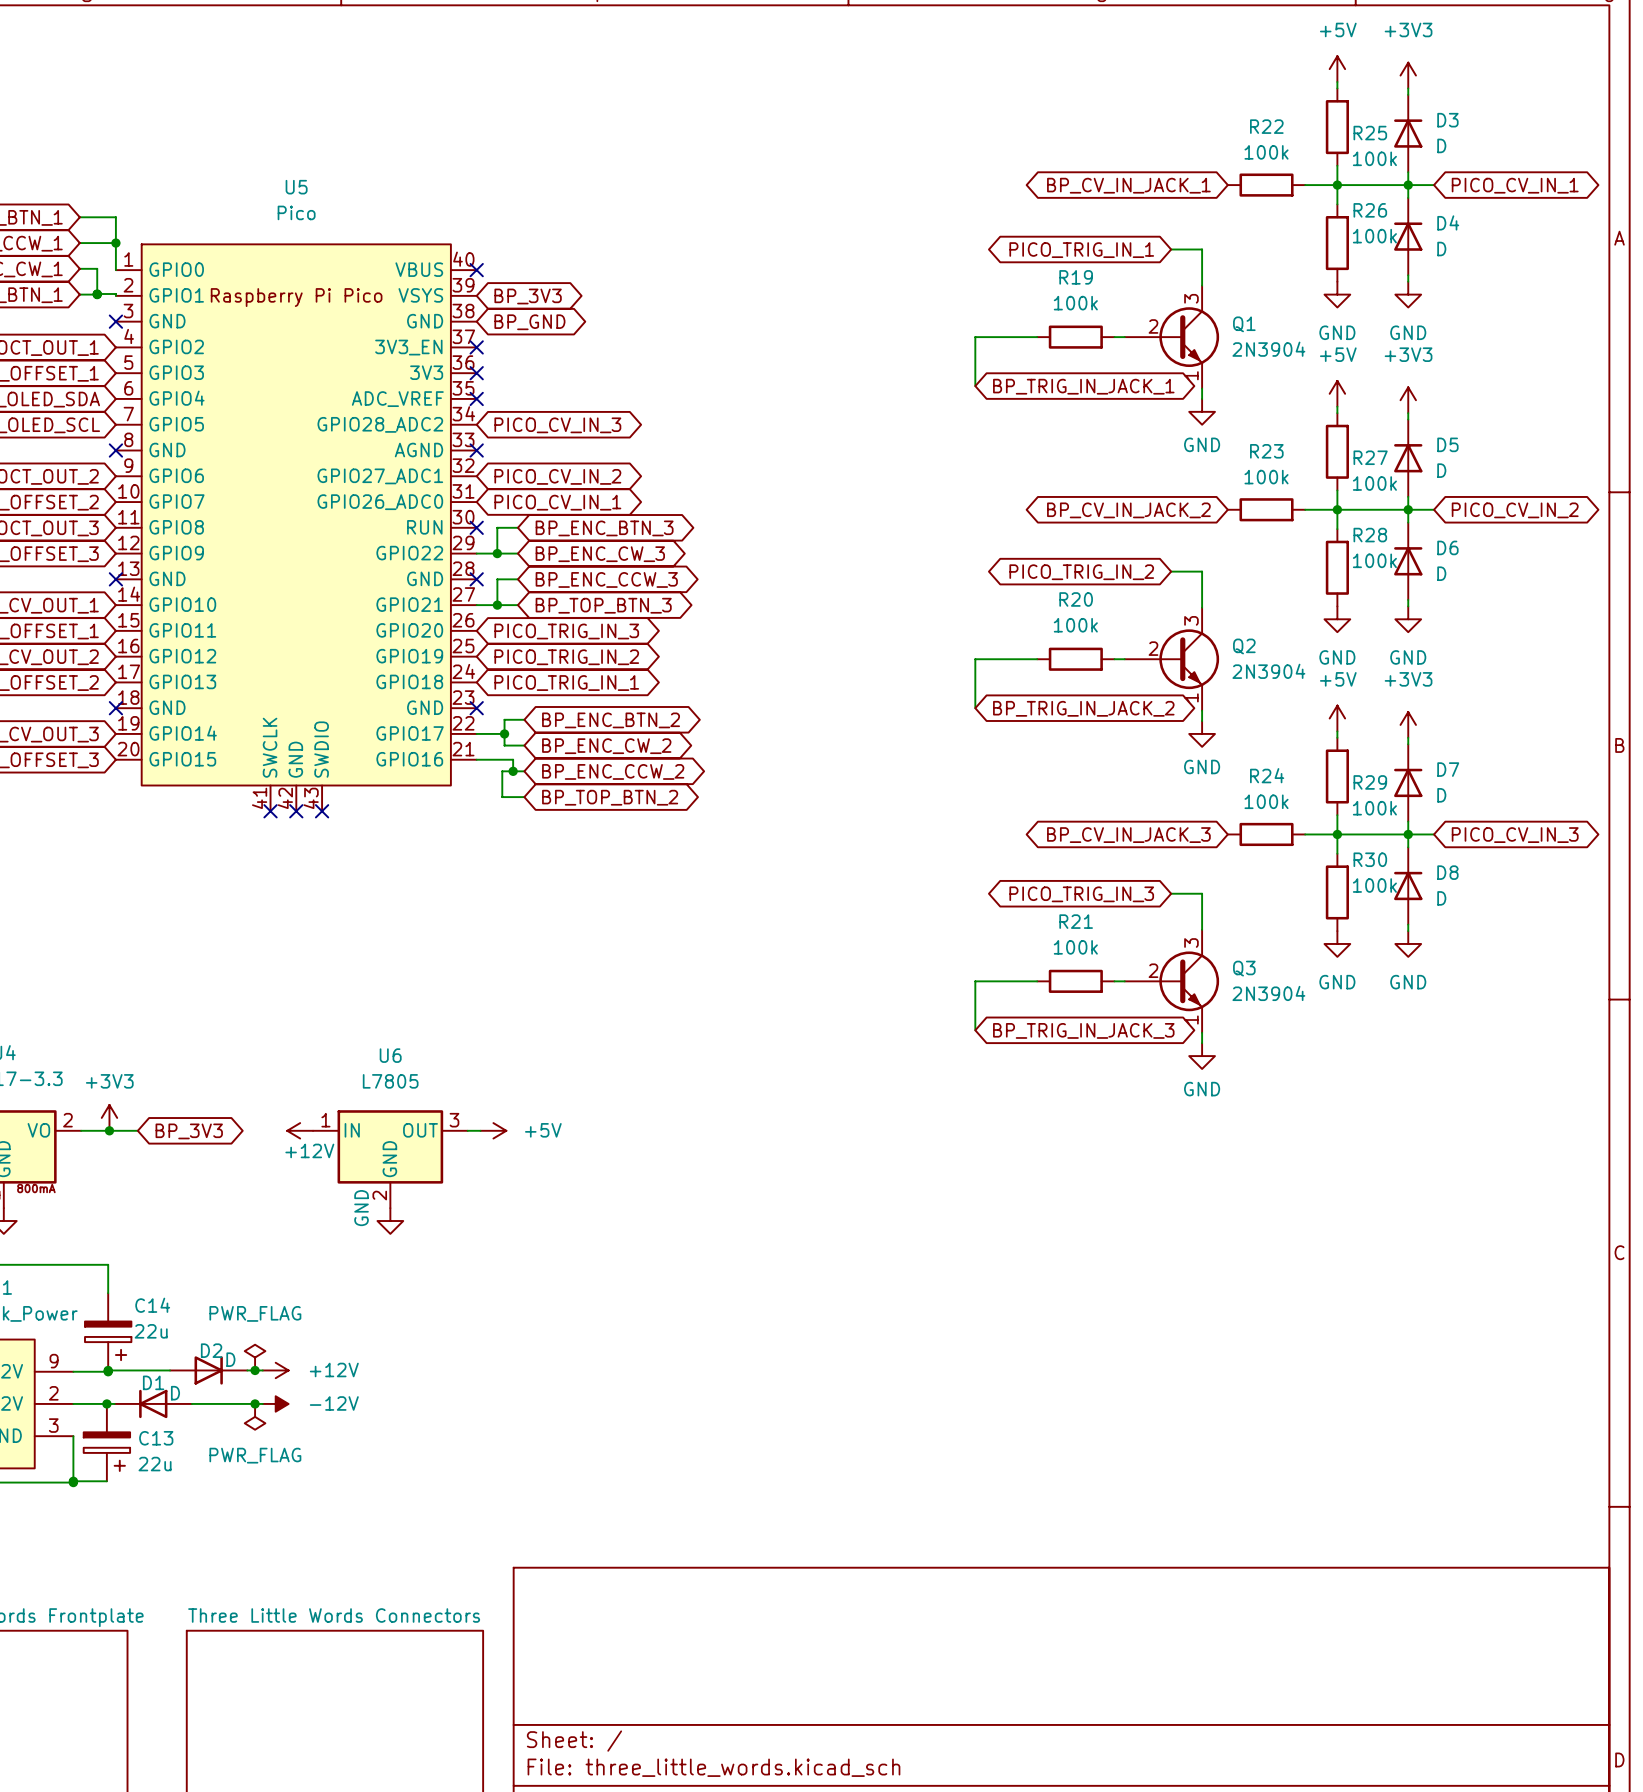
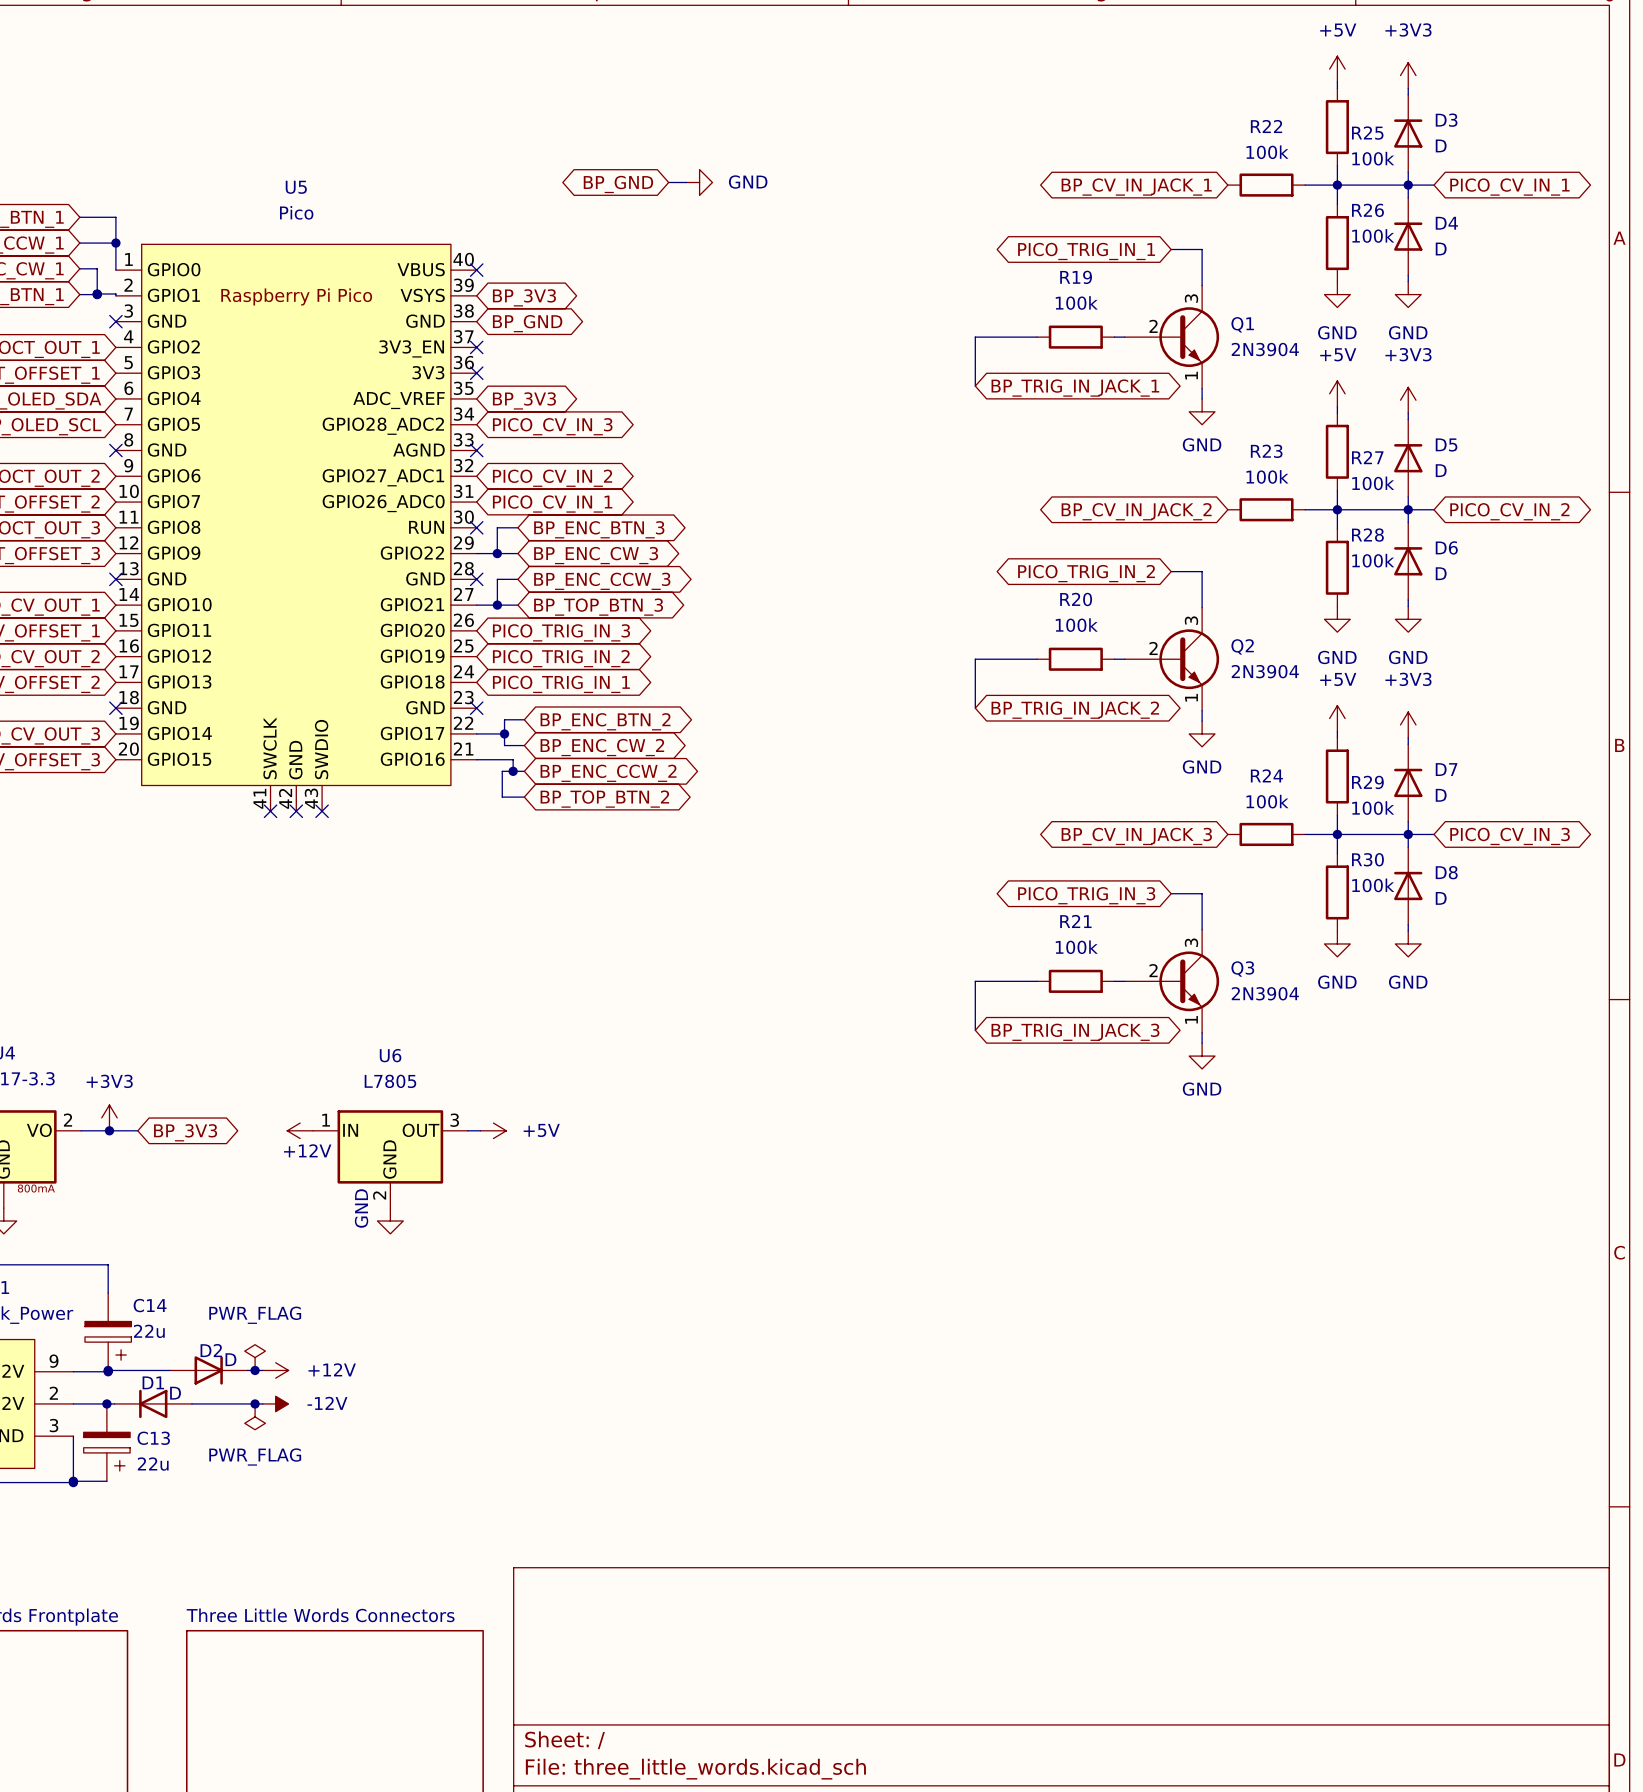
wire: none -> (668, 182) (686, 182)
power symbol: none -> GND (699, 182)
global label: none -> BP_GND (618, 184)
no-connect mark: (476, 398) -> none
global label: none -> BP_3V3 (524, 400)

